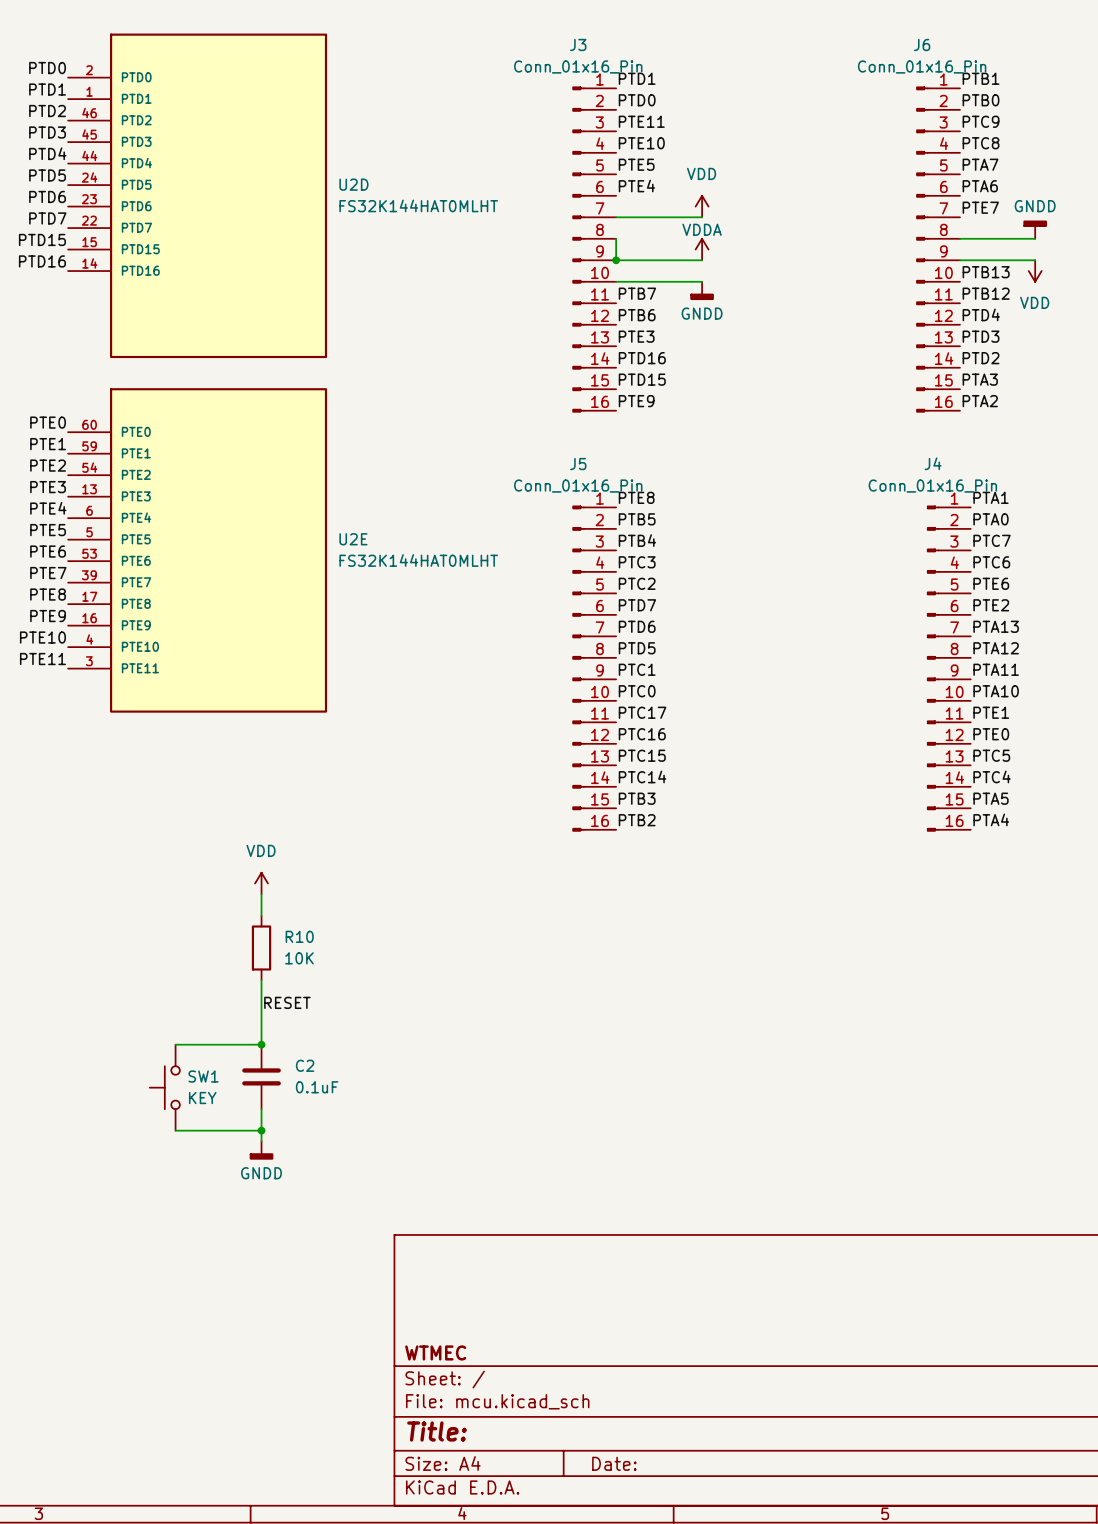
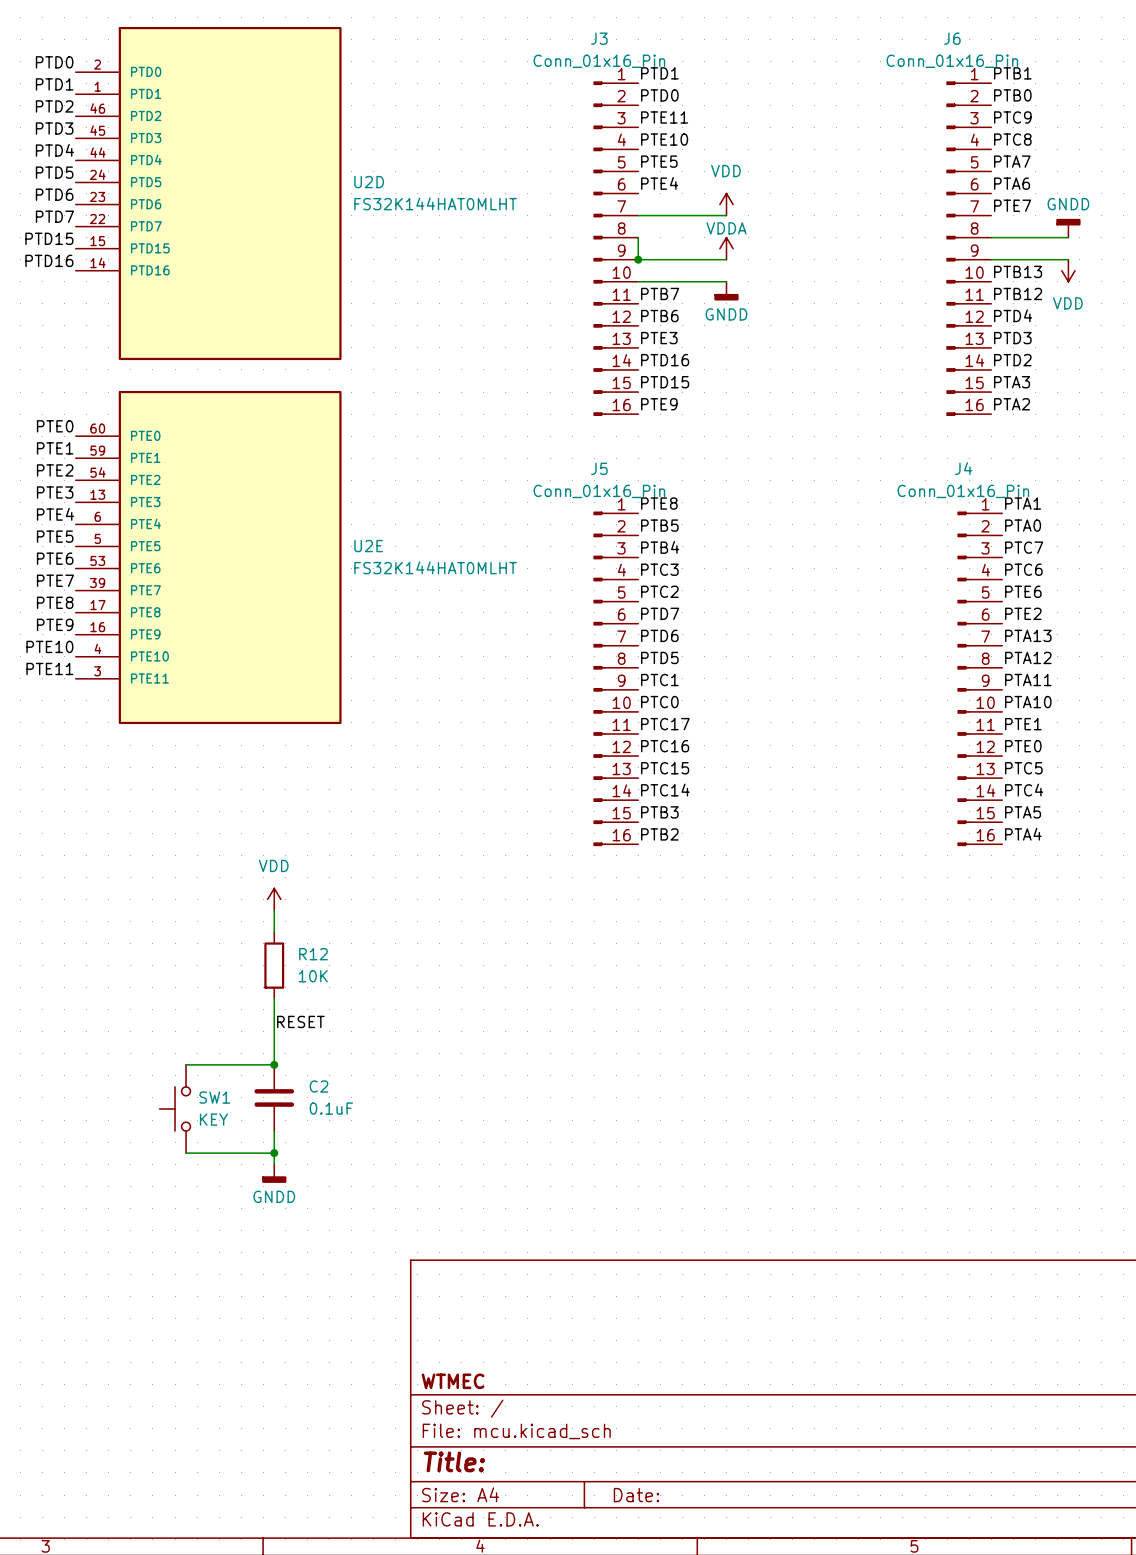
R10 name: R10 (299, 936) -> R12 (313, 954)

